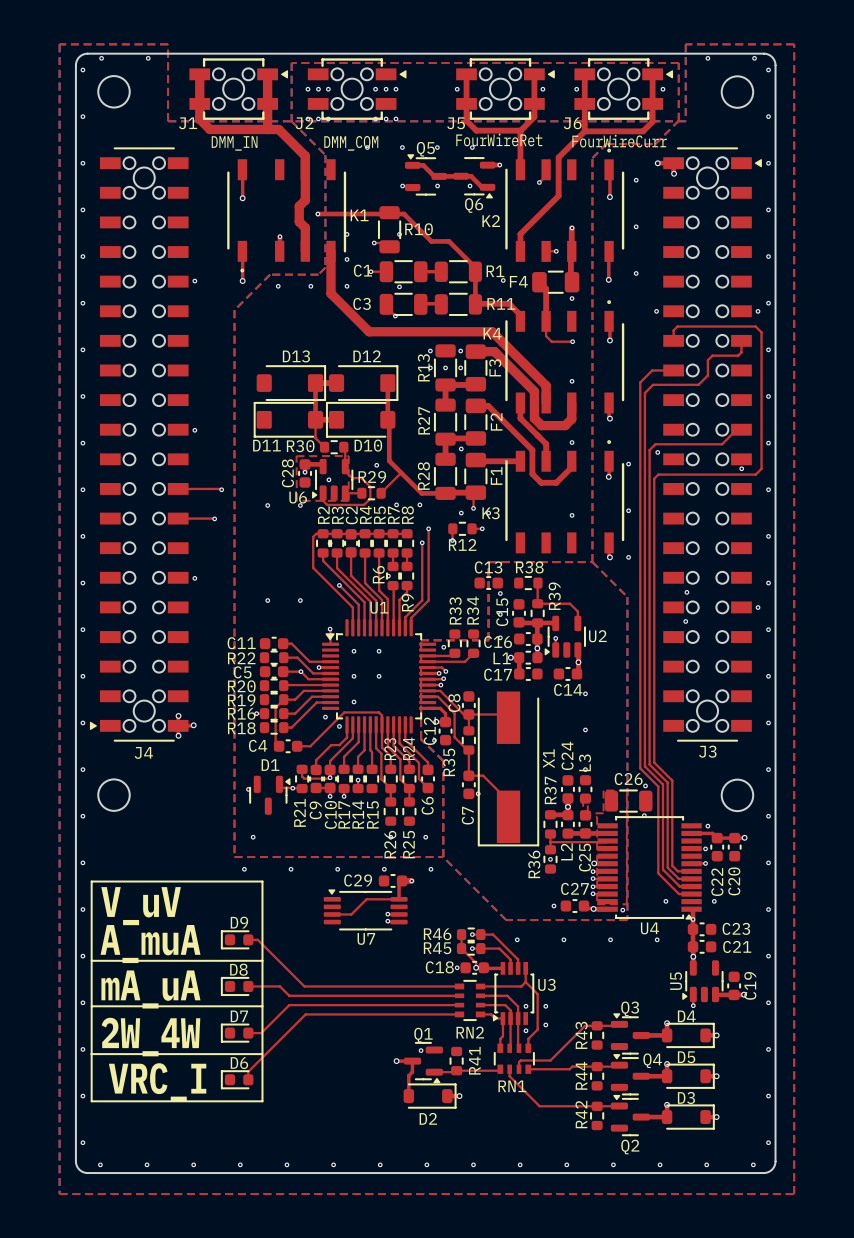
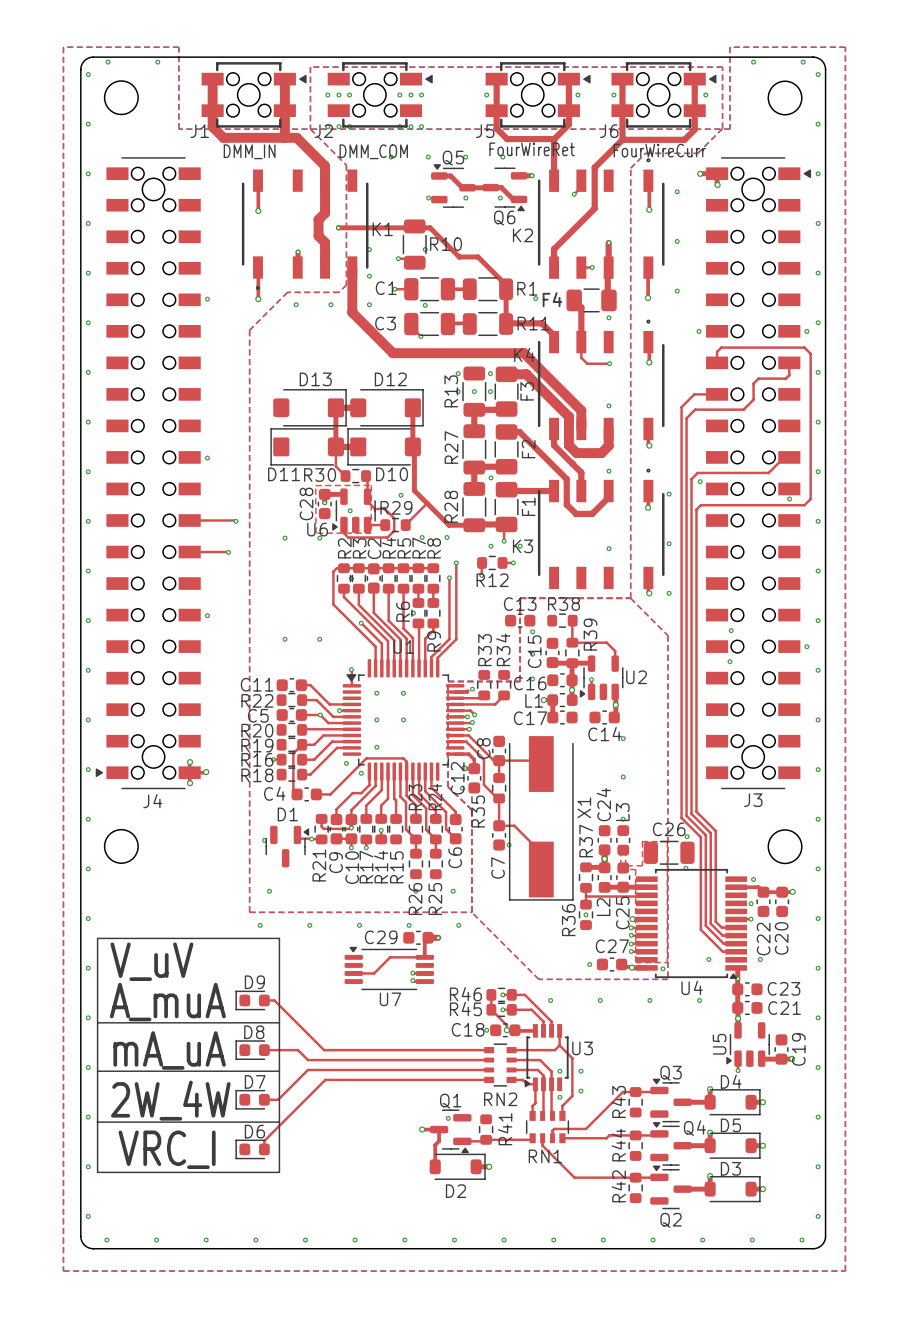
top track: none -> (467, 691) (455, 692)

